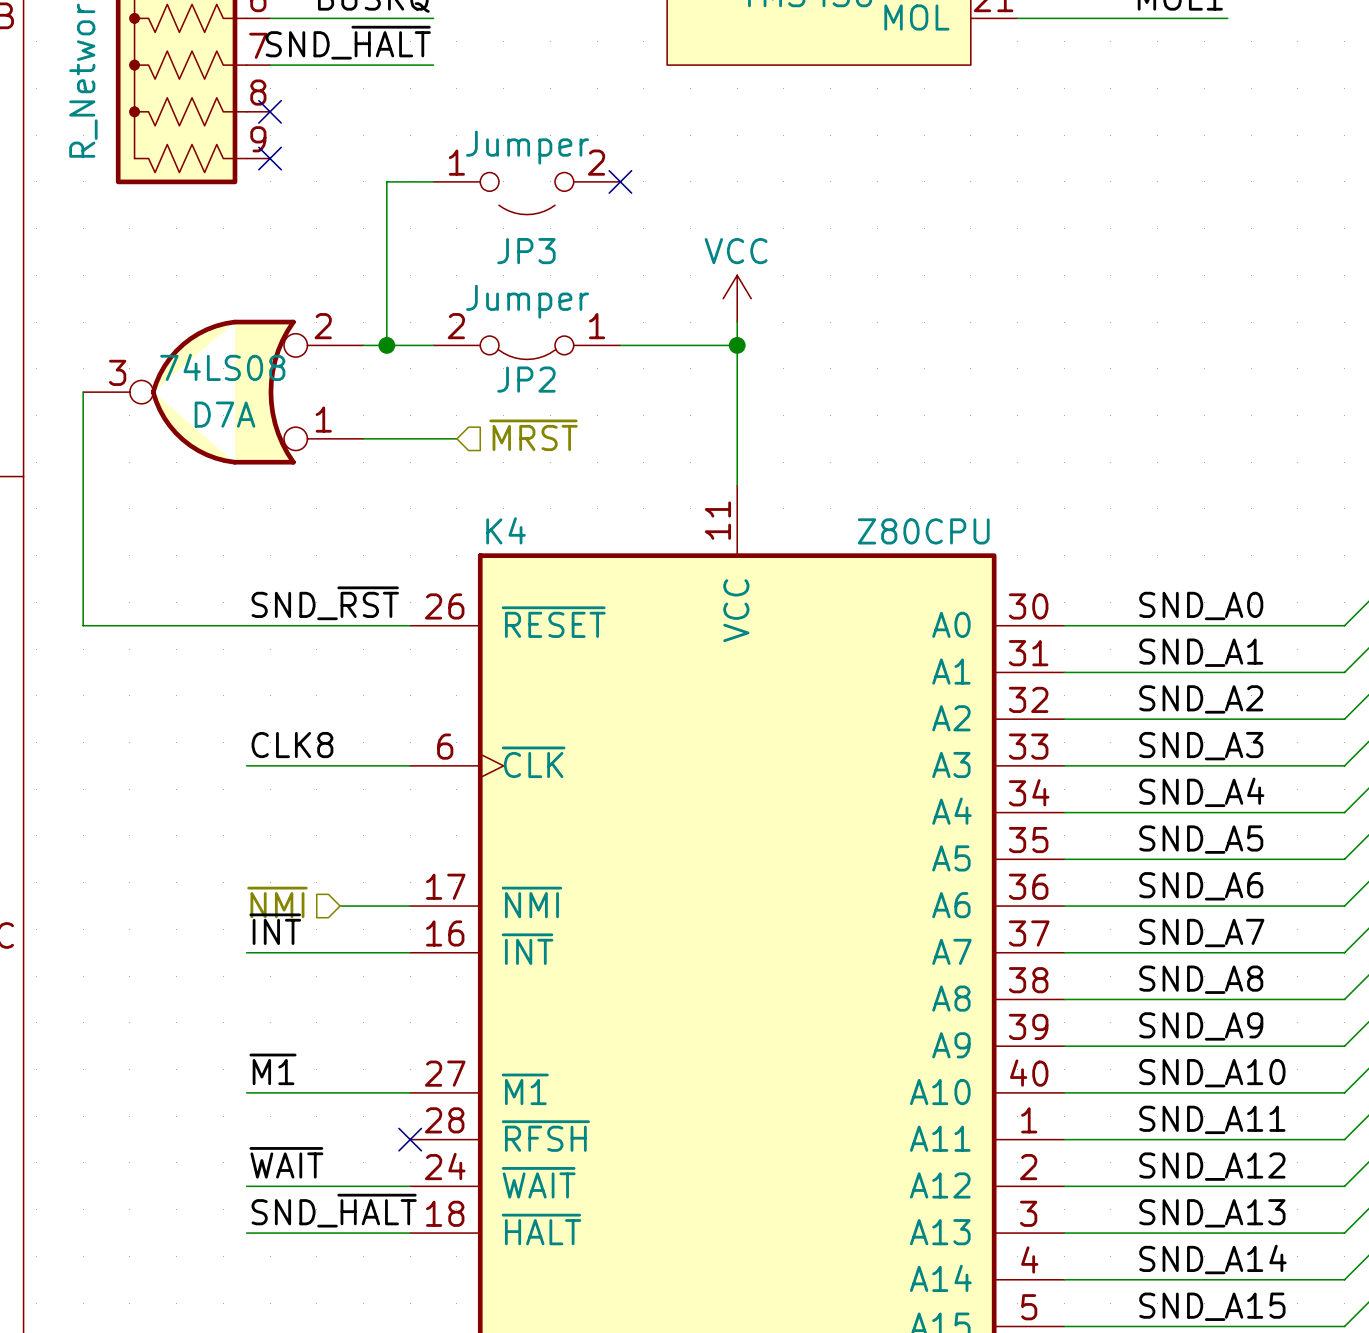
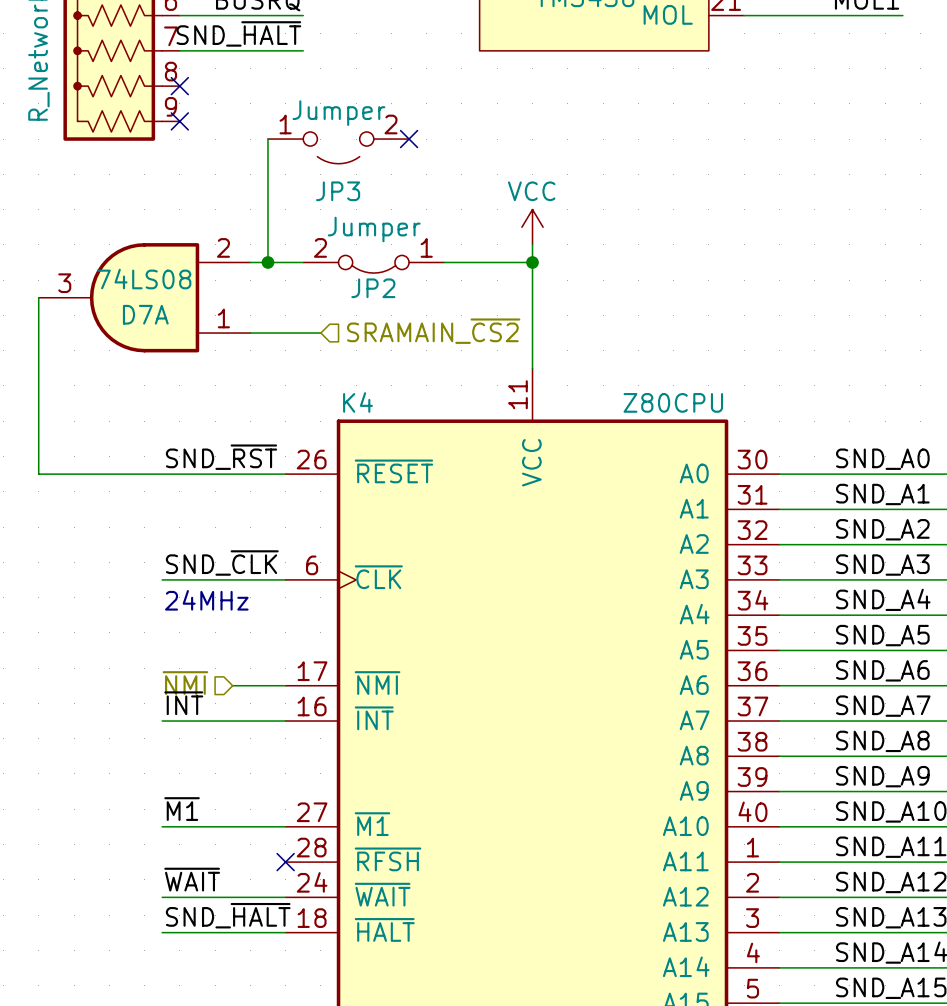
no-connect mark position: (620, 181) -> (409, 139)
JP3 position: (526, 193) -> (338, 147)
D7A symbol: [83, 319, 364, 465] -> [38, 243, 251, 353]
hierarchical label: ~{MRST} (533, 435) -> SRAMAIN_~{CS2} (433, 331)
label: CLK8 (292, 745) -> SND_~{CLK} (222, 563)
text: none -> 24MHz (206, 600)

